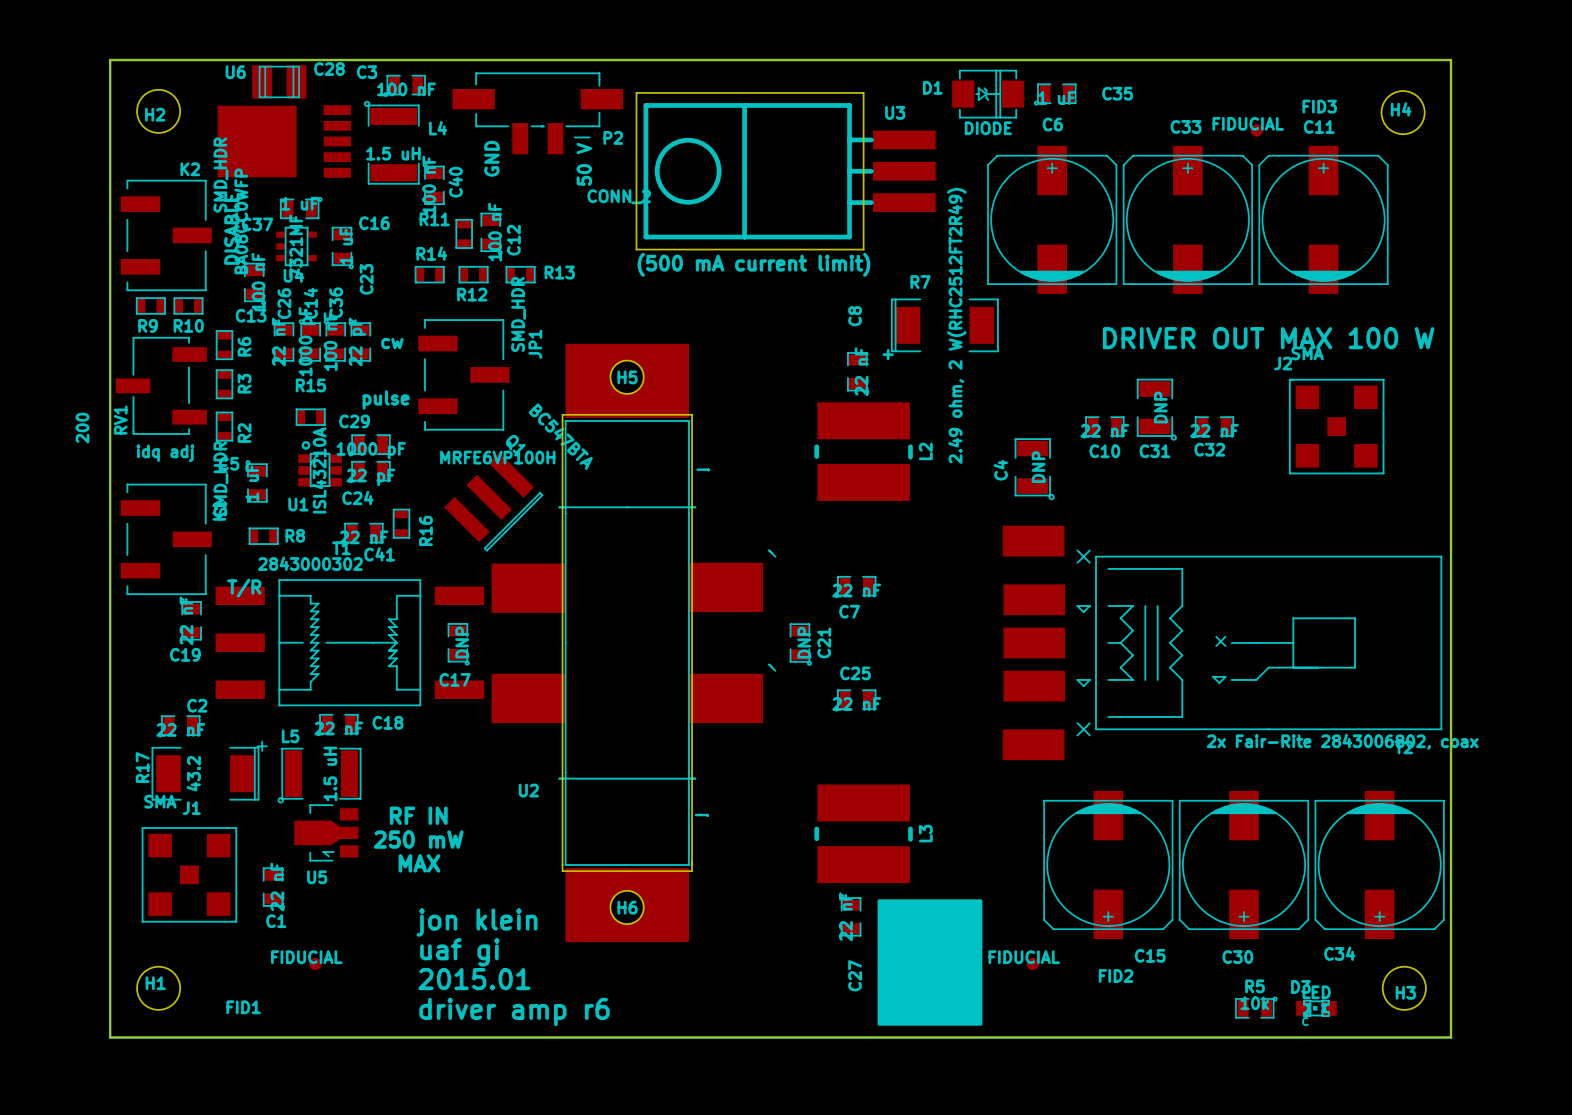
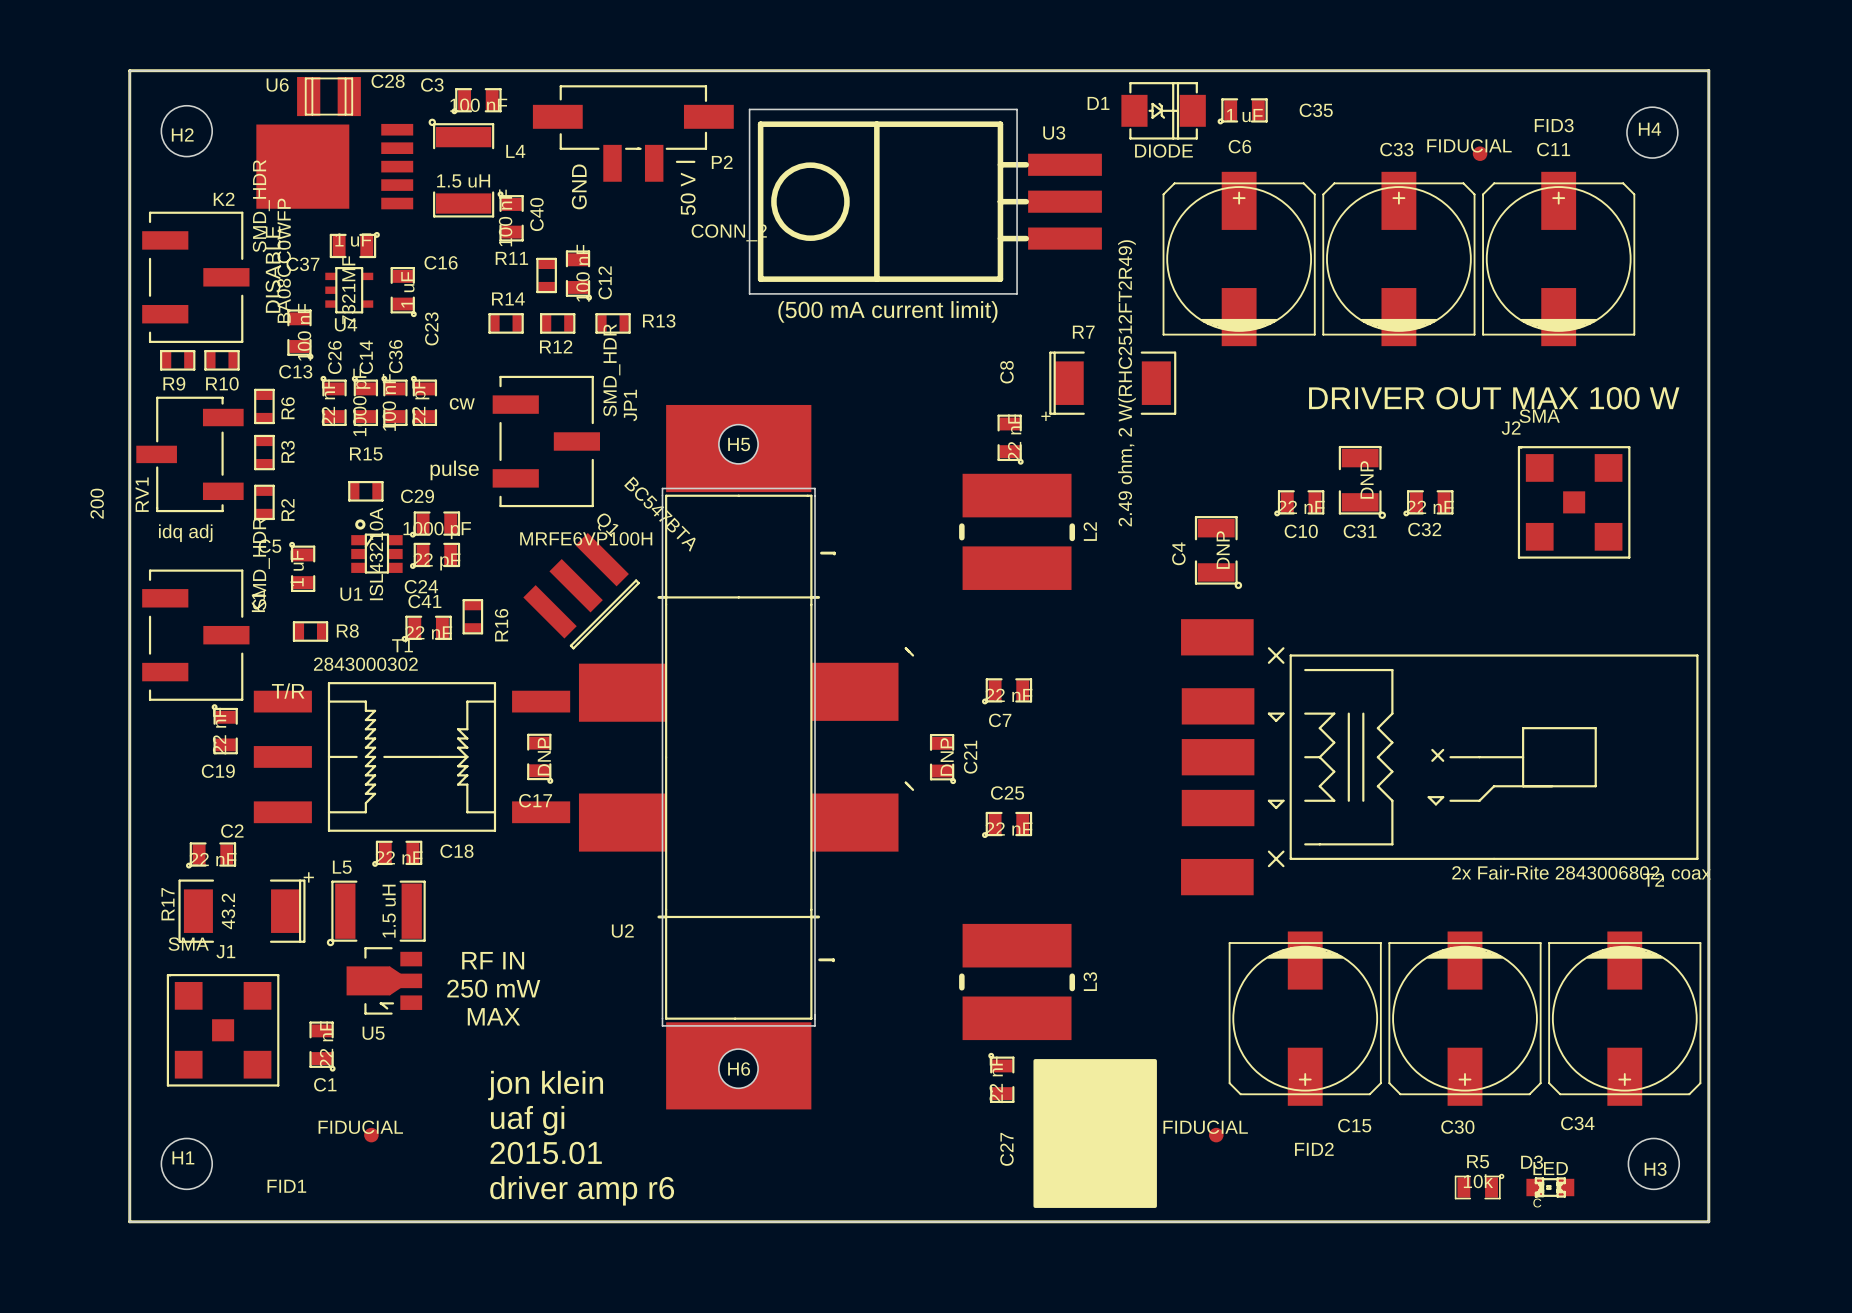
C41 name position: C41 (379, 554) -> C41 (424, 601)

